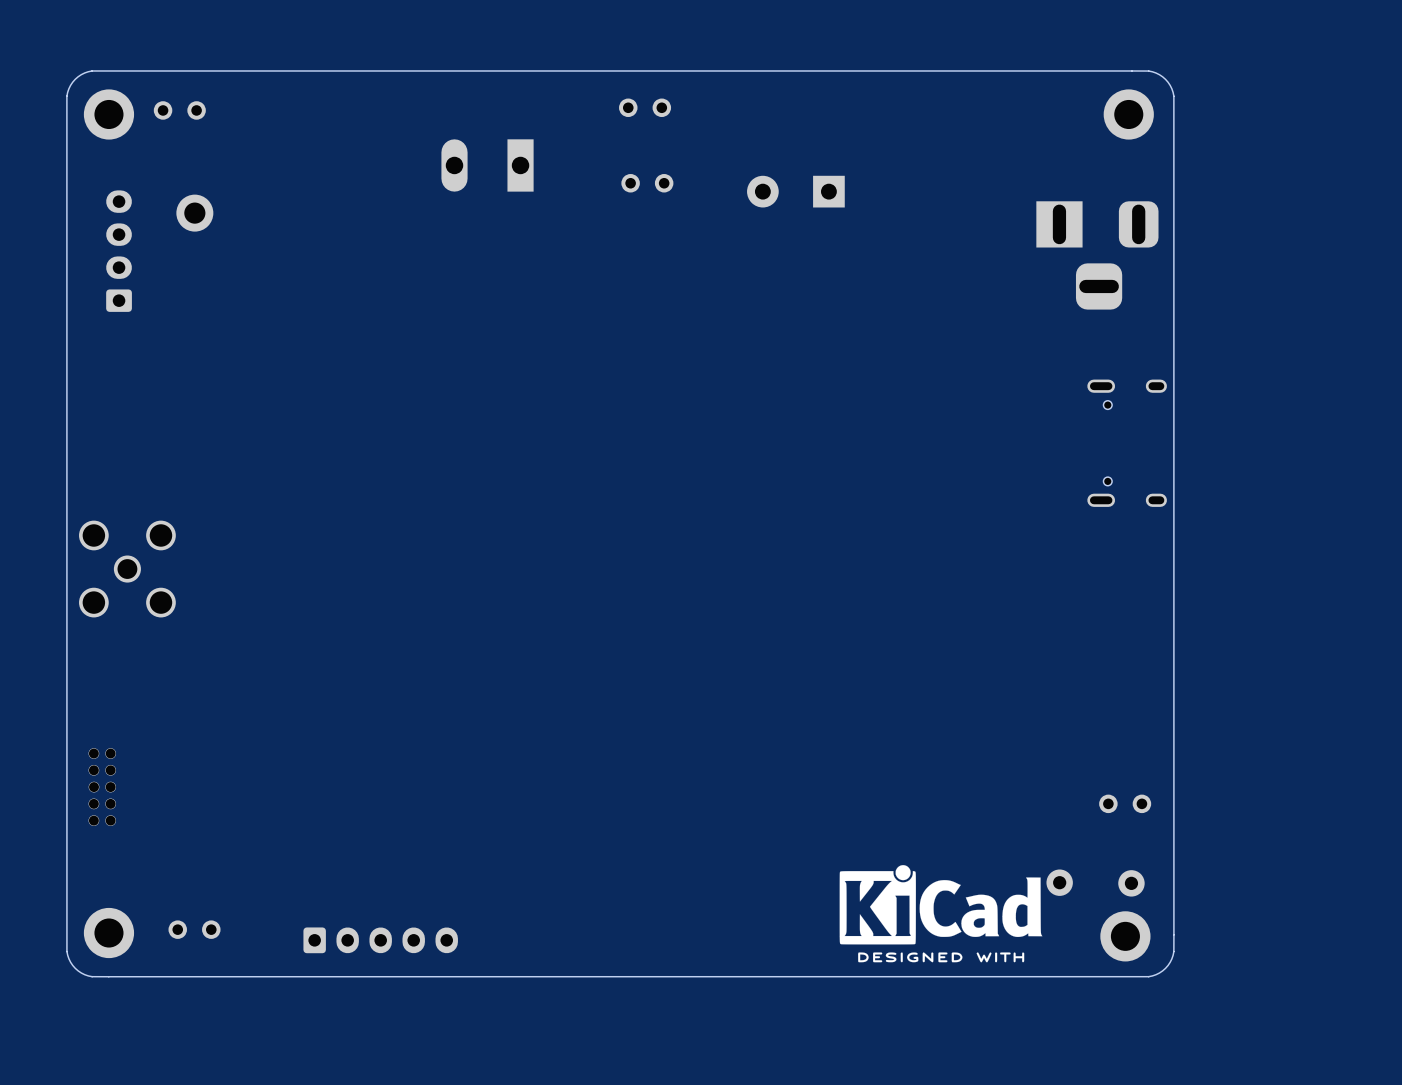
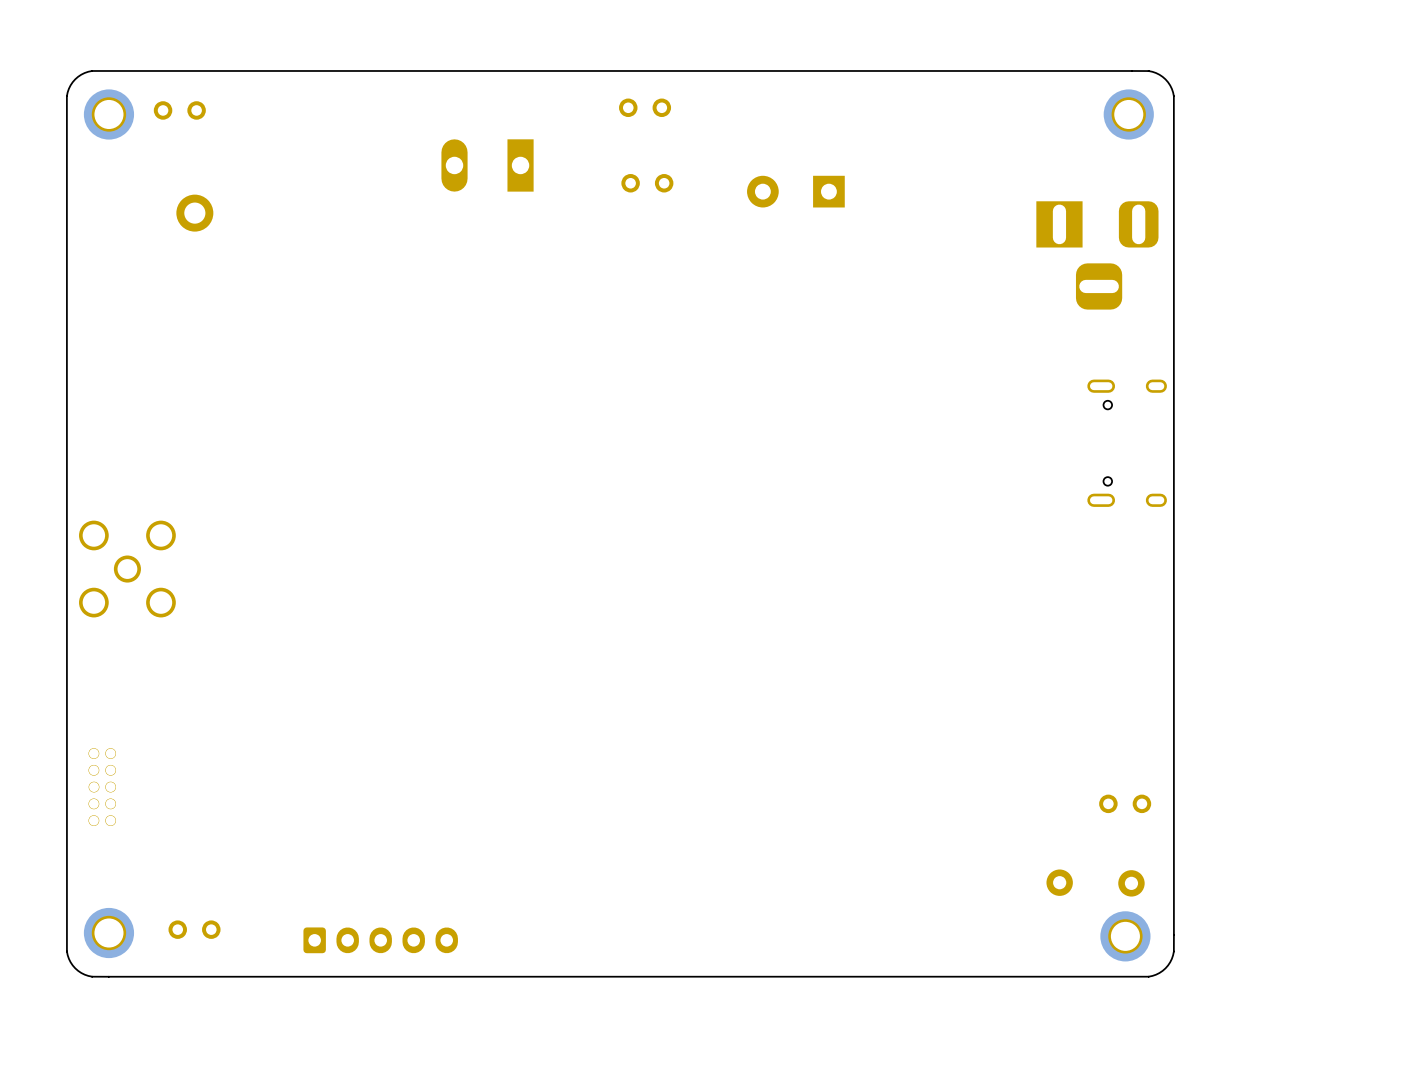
part: (119, 251) -> none
drawing: [839, 865, 1043, 963] -> none

